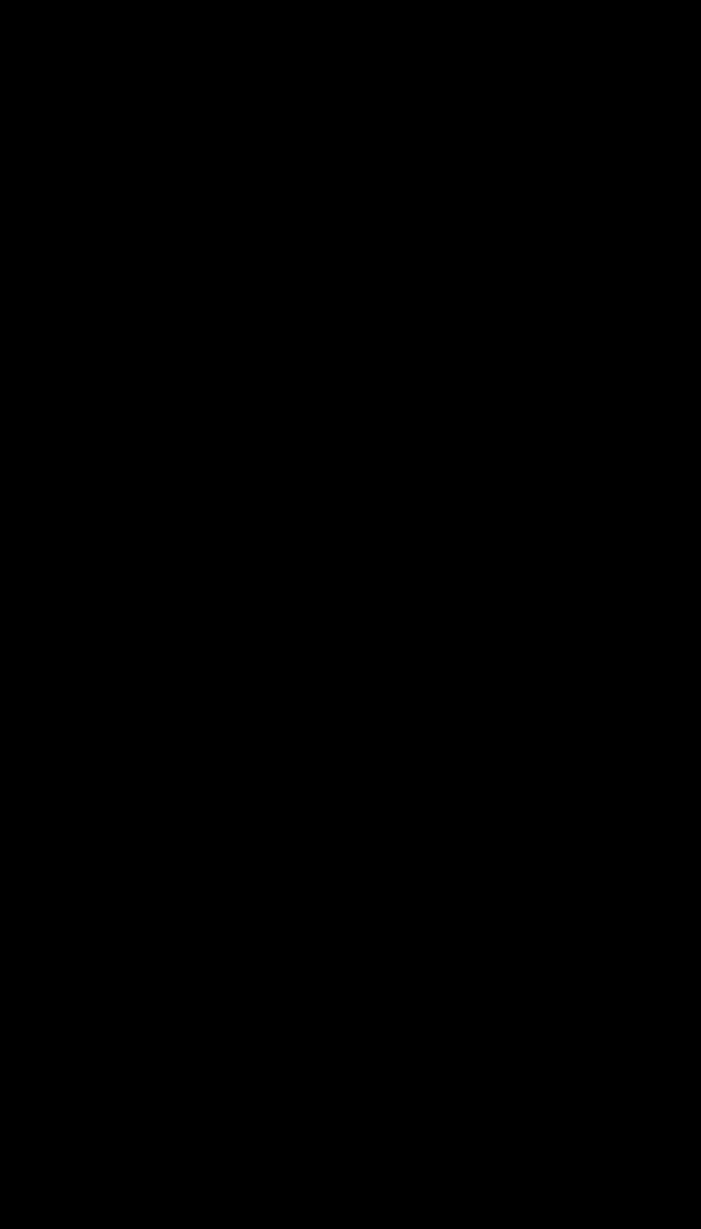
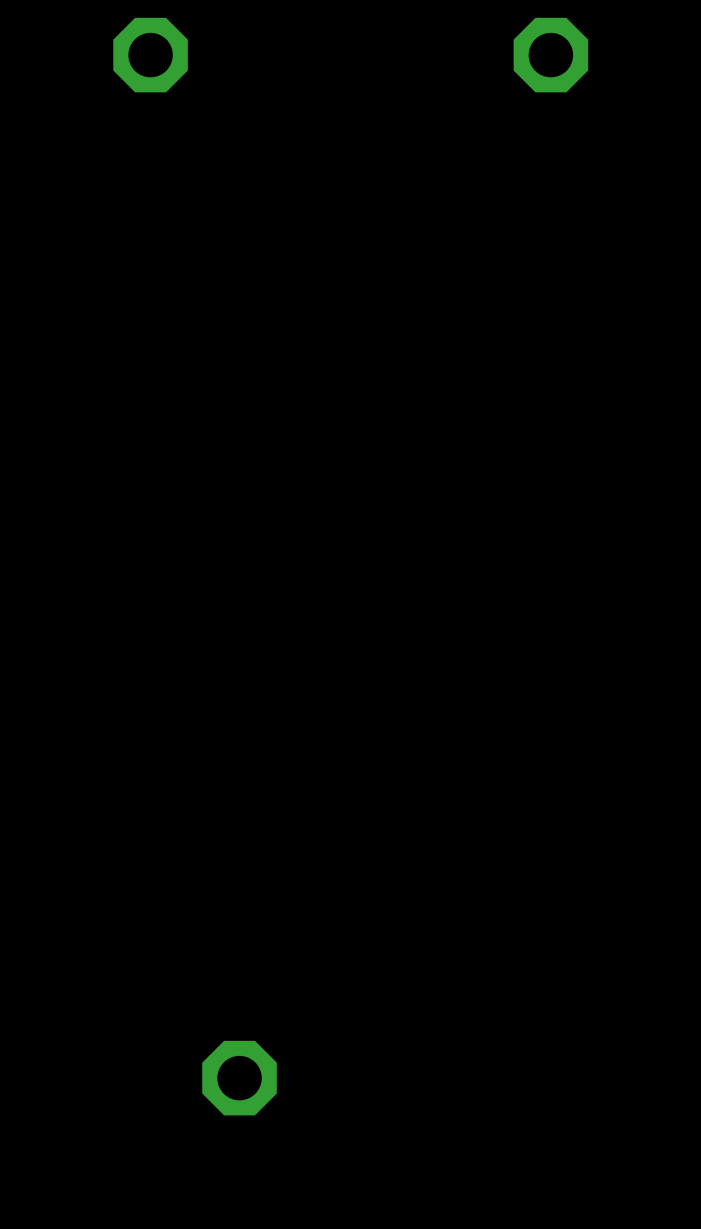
part: none -> (150, 55)
part: none -> (550, 55)
part: none -> (239, 1078)

